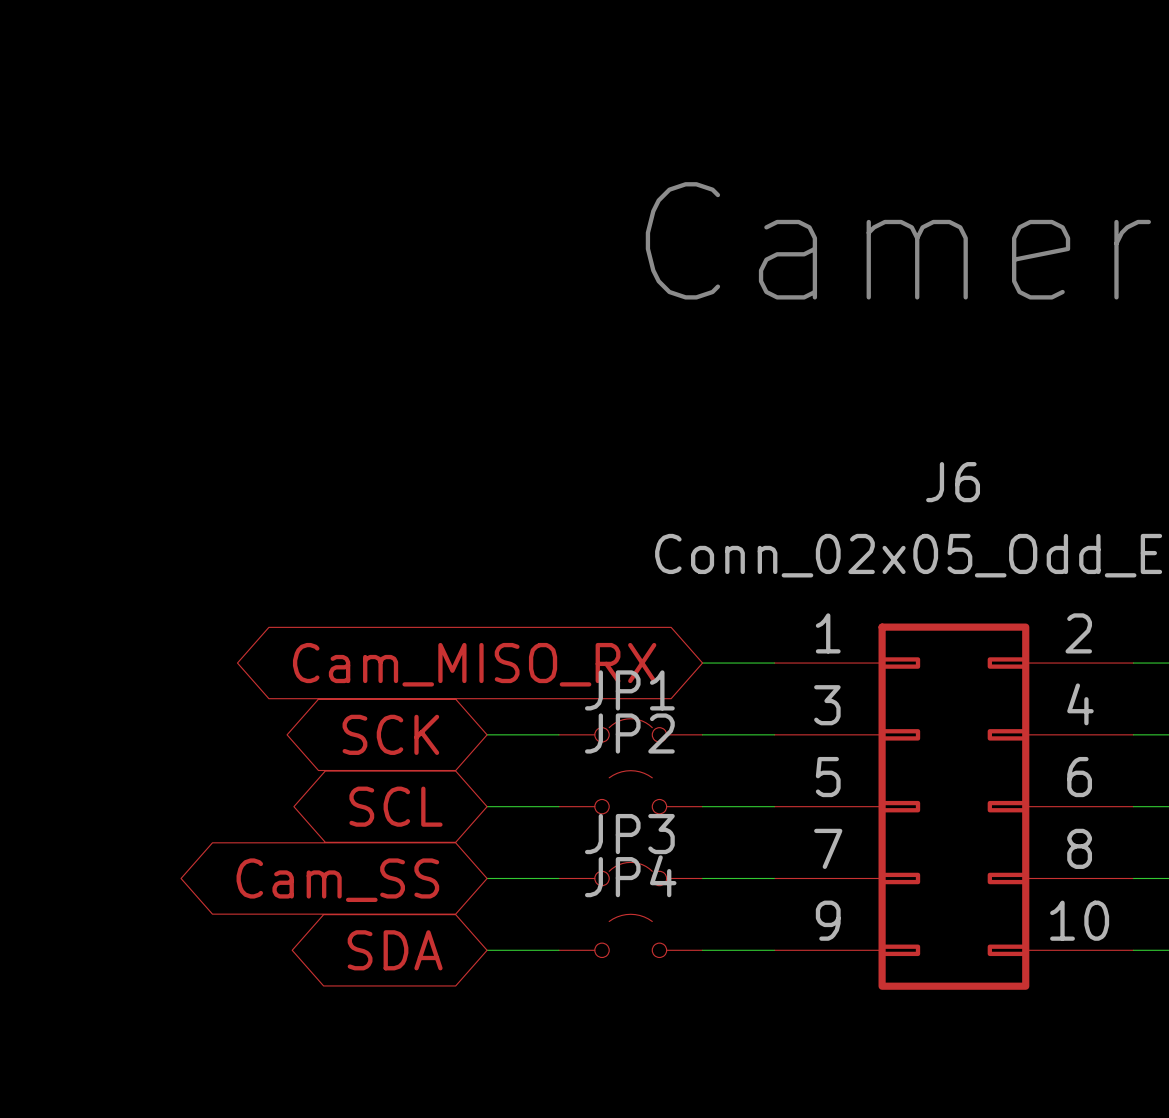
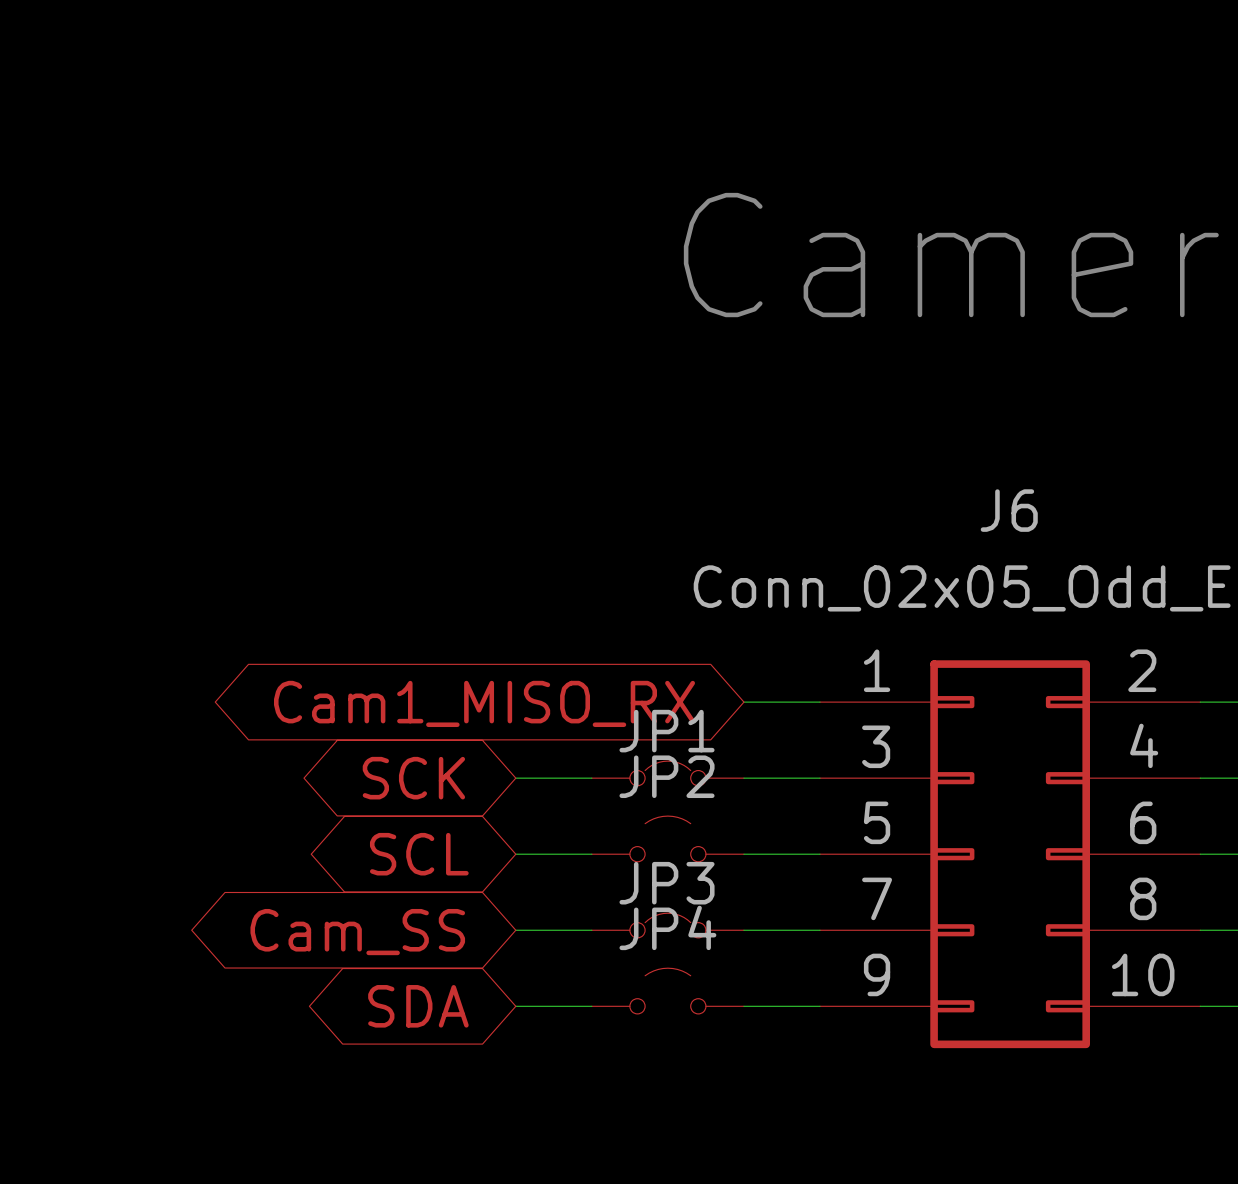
global label: Cam_MISO_RX (474, 664) -> Cam1_MISO_RX (484, 703)

